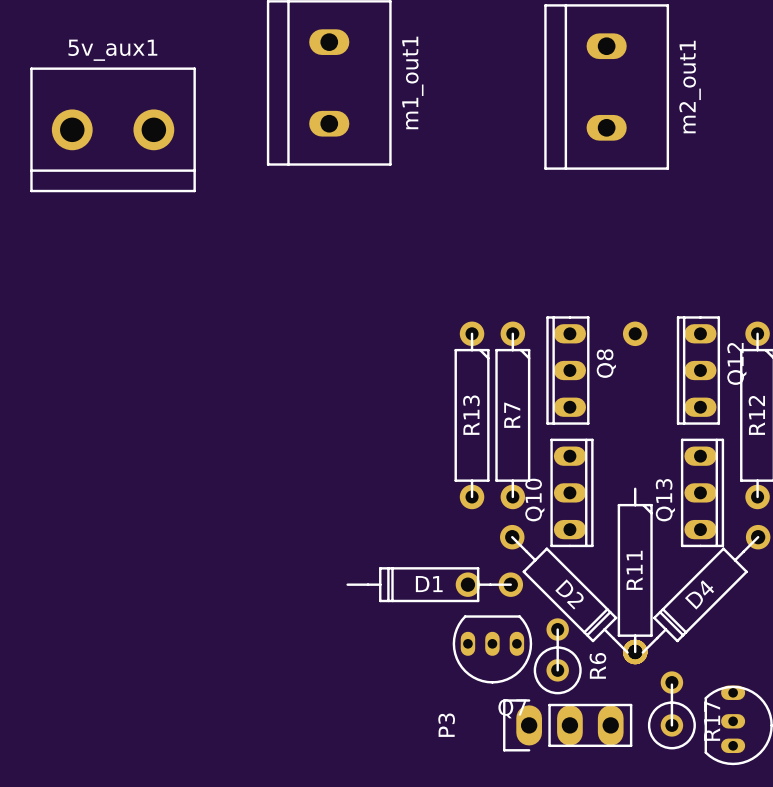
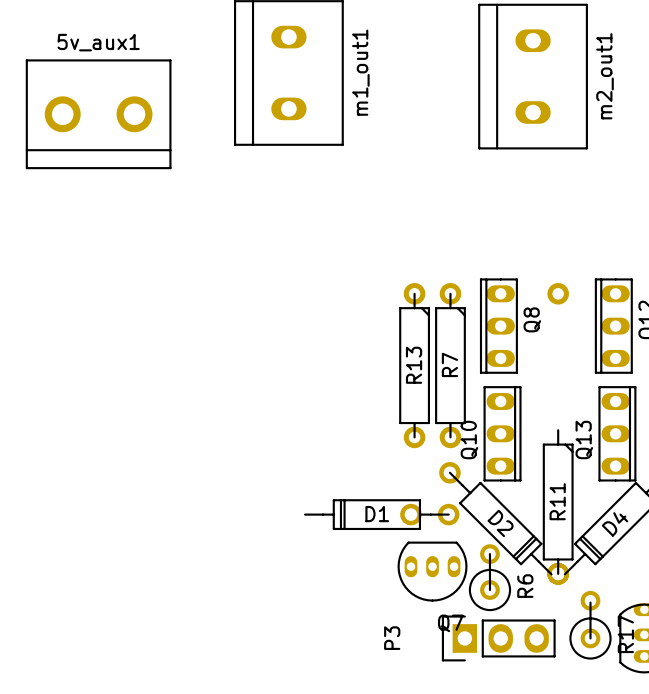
P3 footprint: [503, 699, 633, 752] -> [441, 615, 556, 662]

